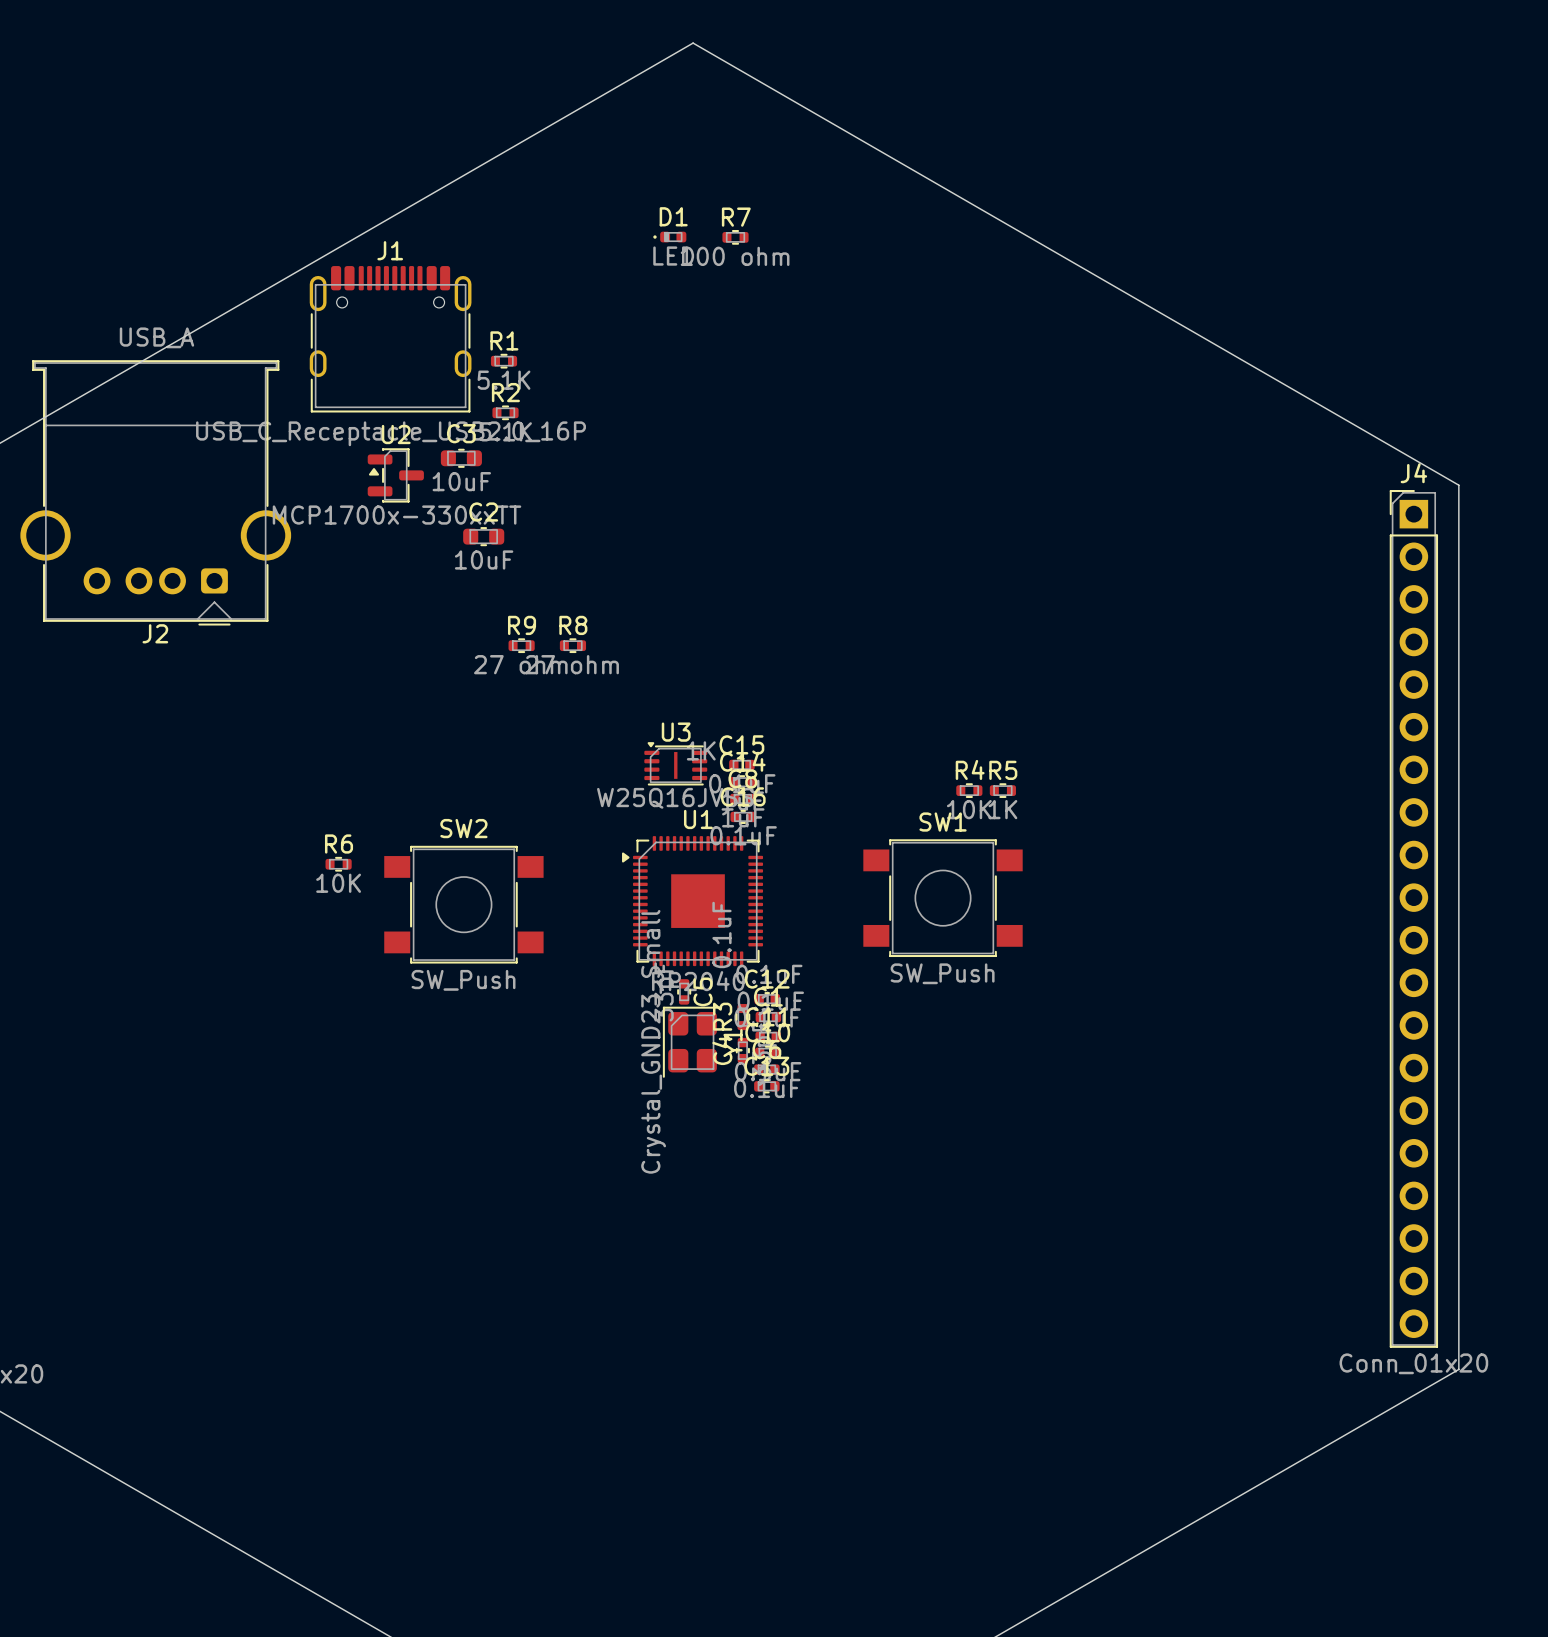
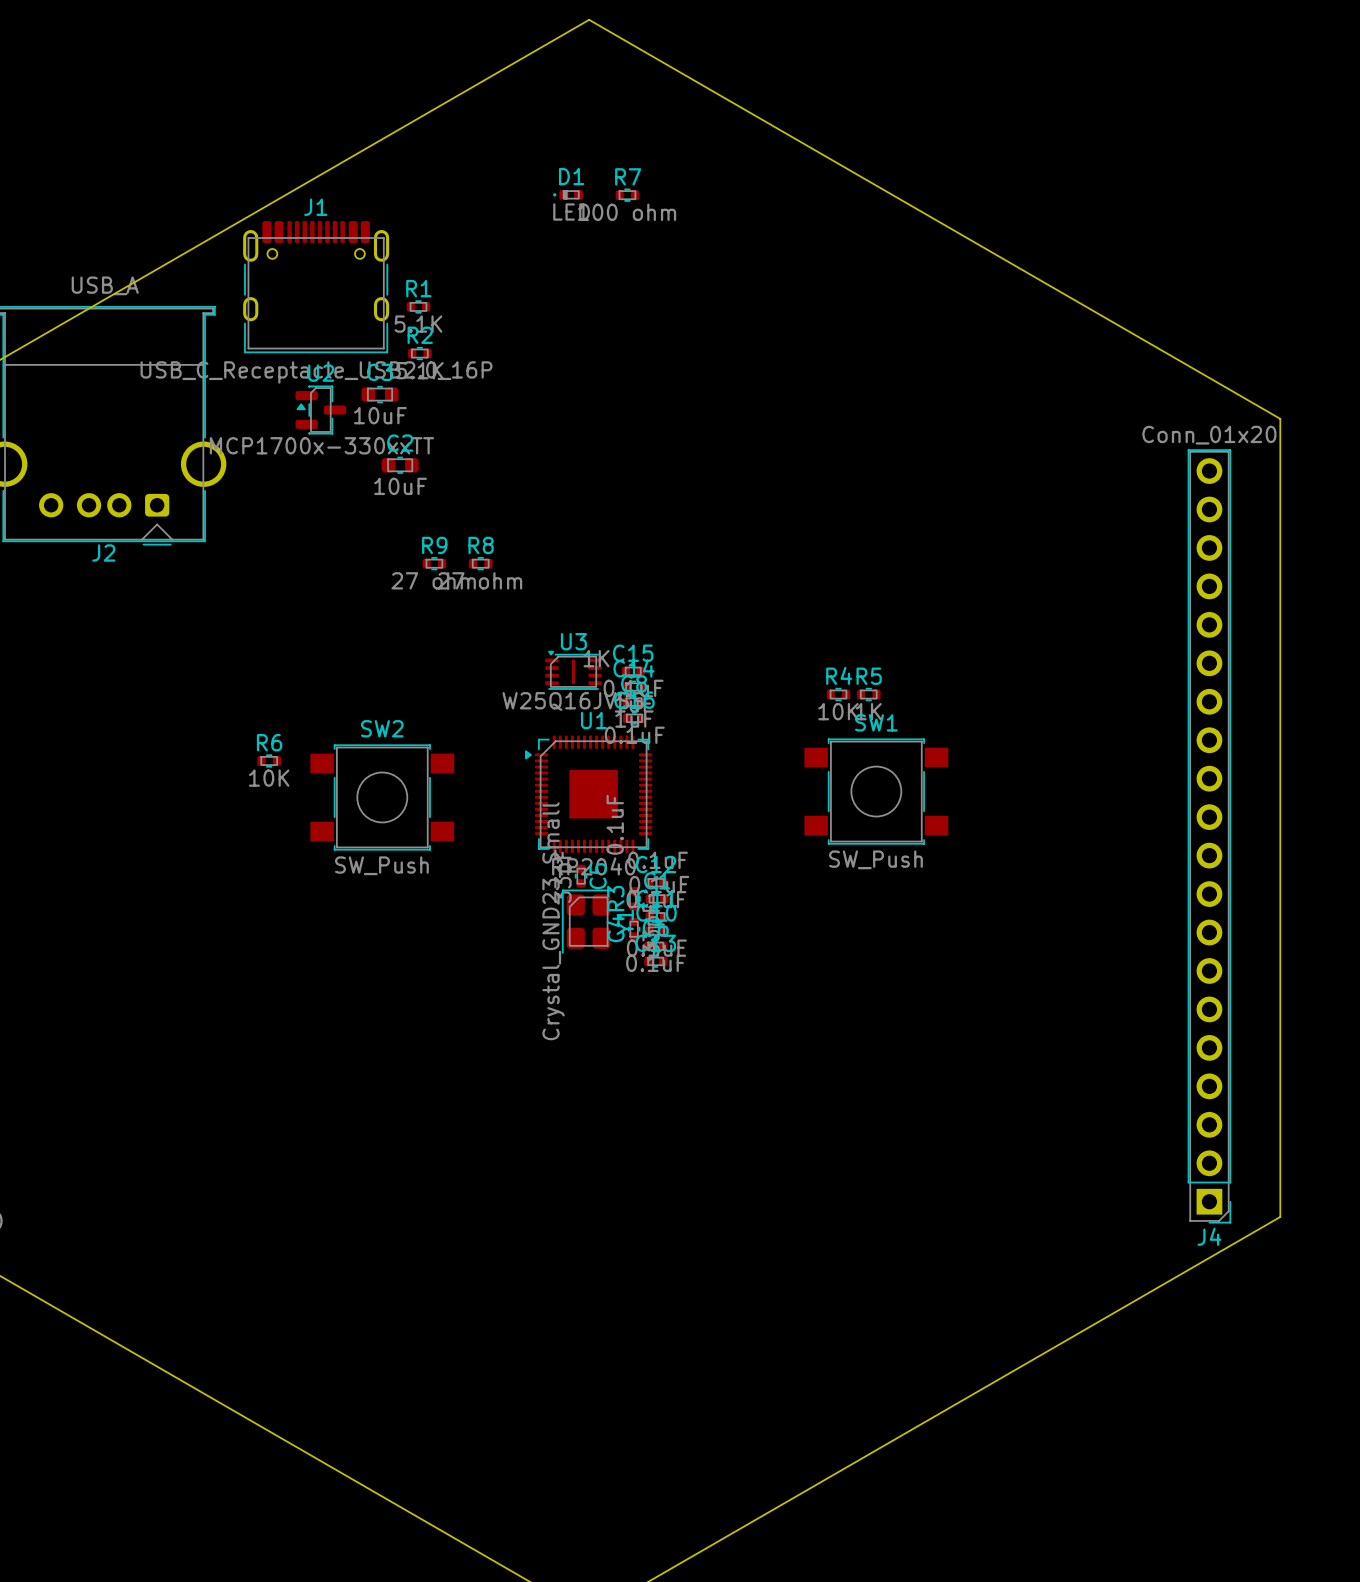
SW1 position: (943, 898) -> (876, 791)
J4 rotation: 0° (1413, 918) -> 180° (1209, 836)

